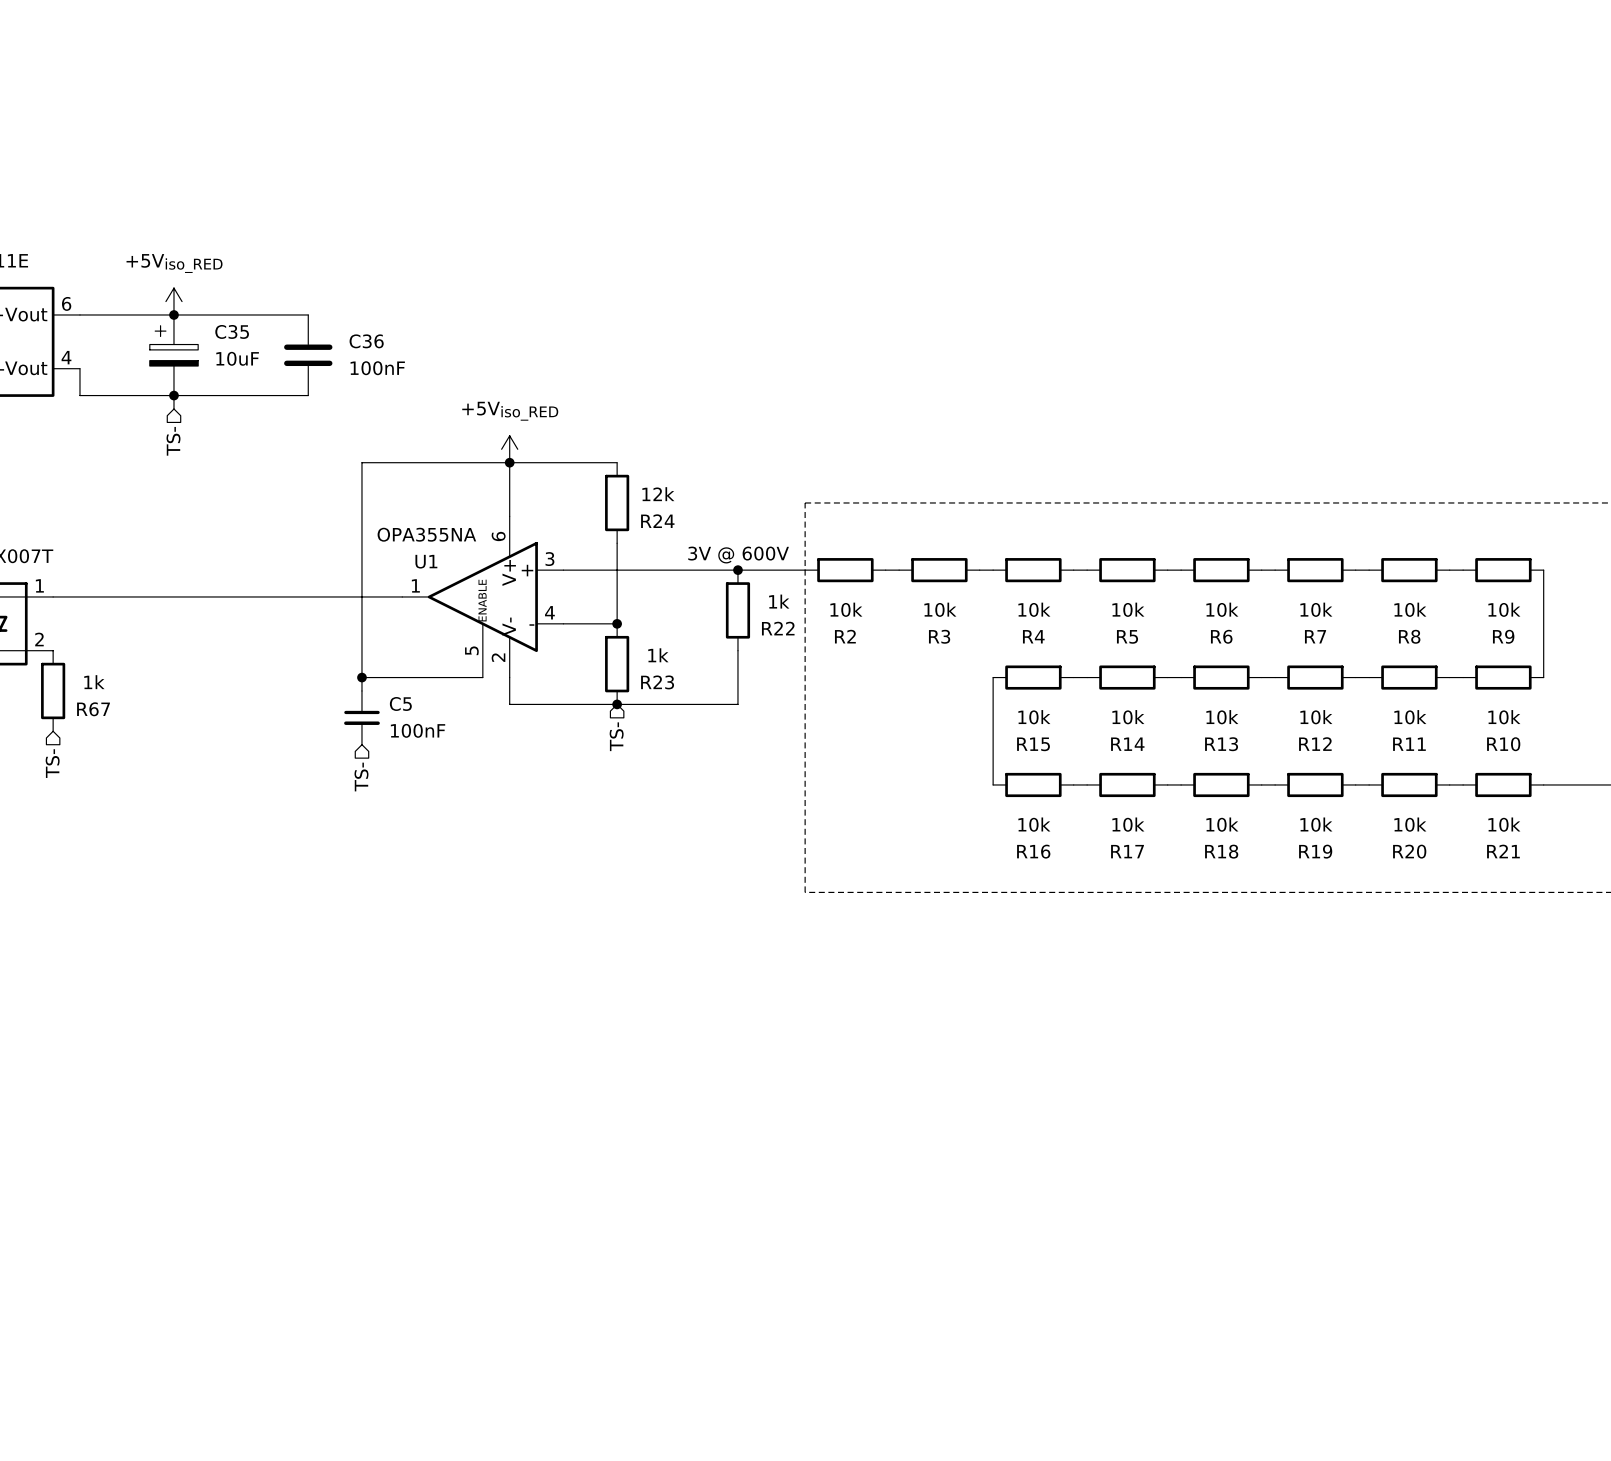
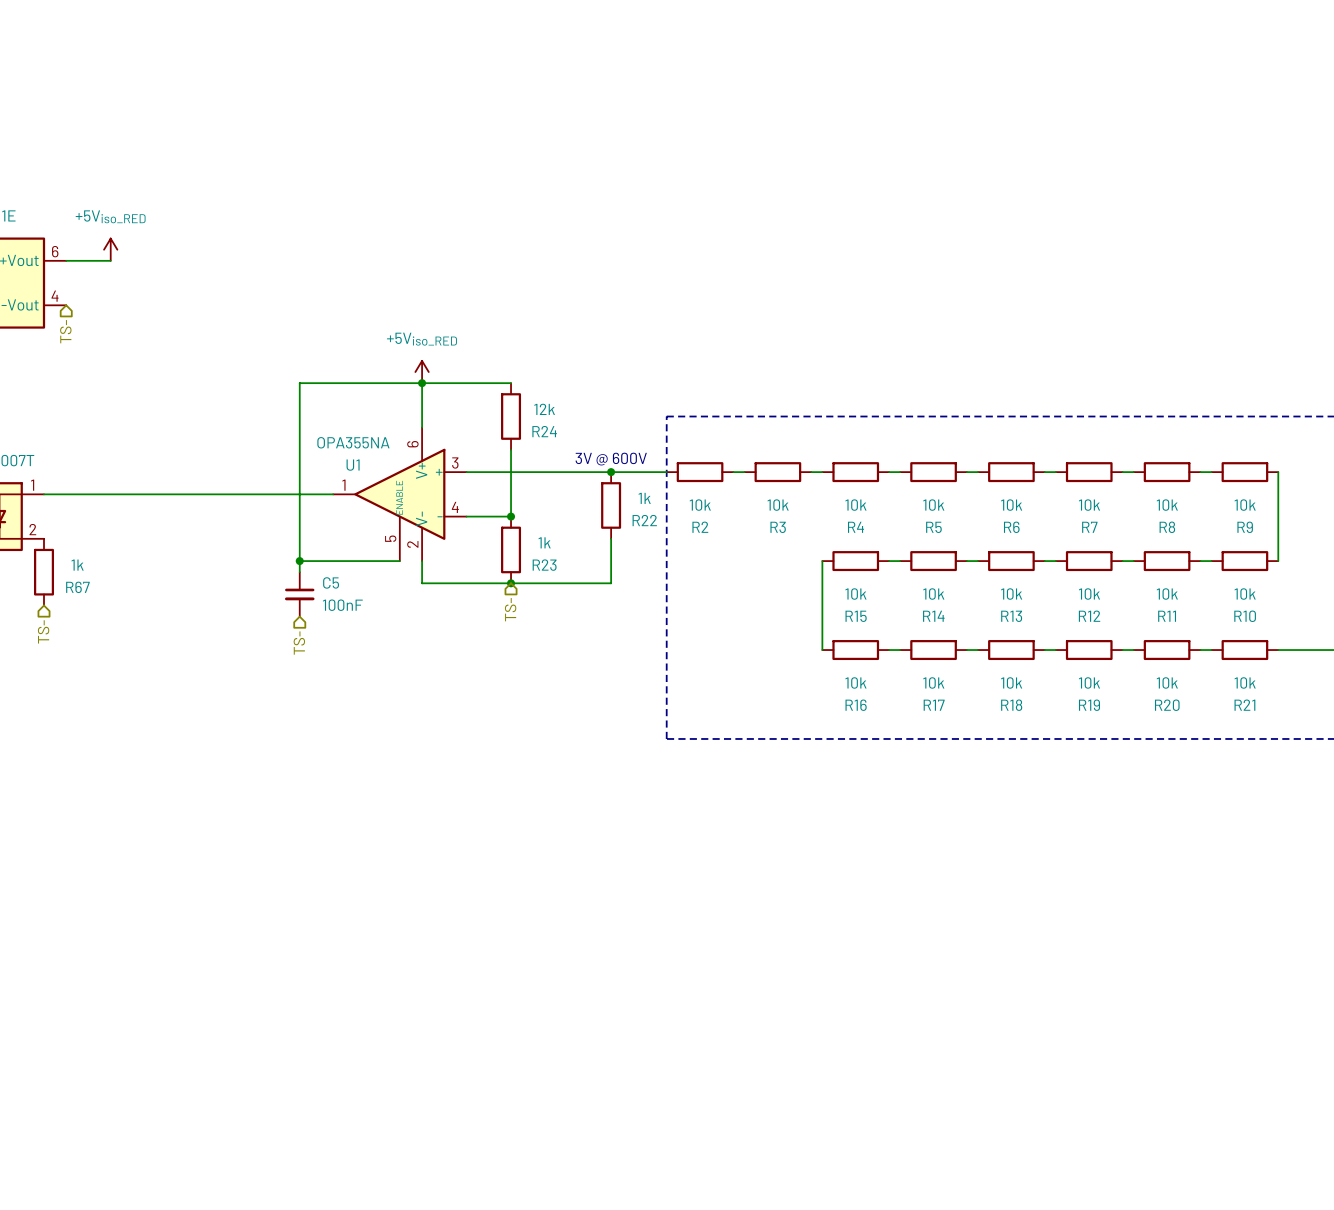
power symbol position: +5Viso_RED (173, 301) -> +5Viso_RED (110, 249)
wire: (133, 314) (308, 314) -> none
junction: (173, 314) -> none
C35: 10uF (173, 355) -> none
C36: 100nF (308, 355) -> none
wire: (79, 368) (79, 395) (308, 395) -> none
wire: (173, 395) (173, 408) -> none
junction: (173, 395) -> none
hierarchical label position: TS- (173, 441) -> TS- (65, 331)

